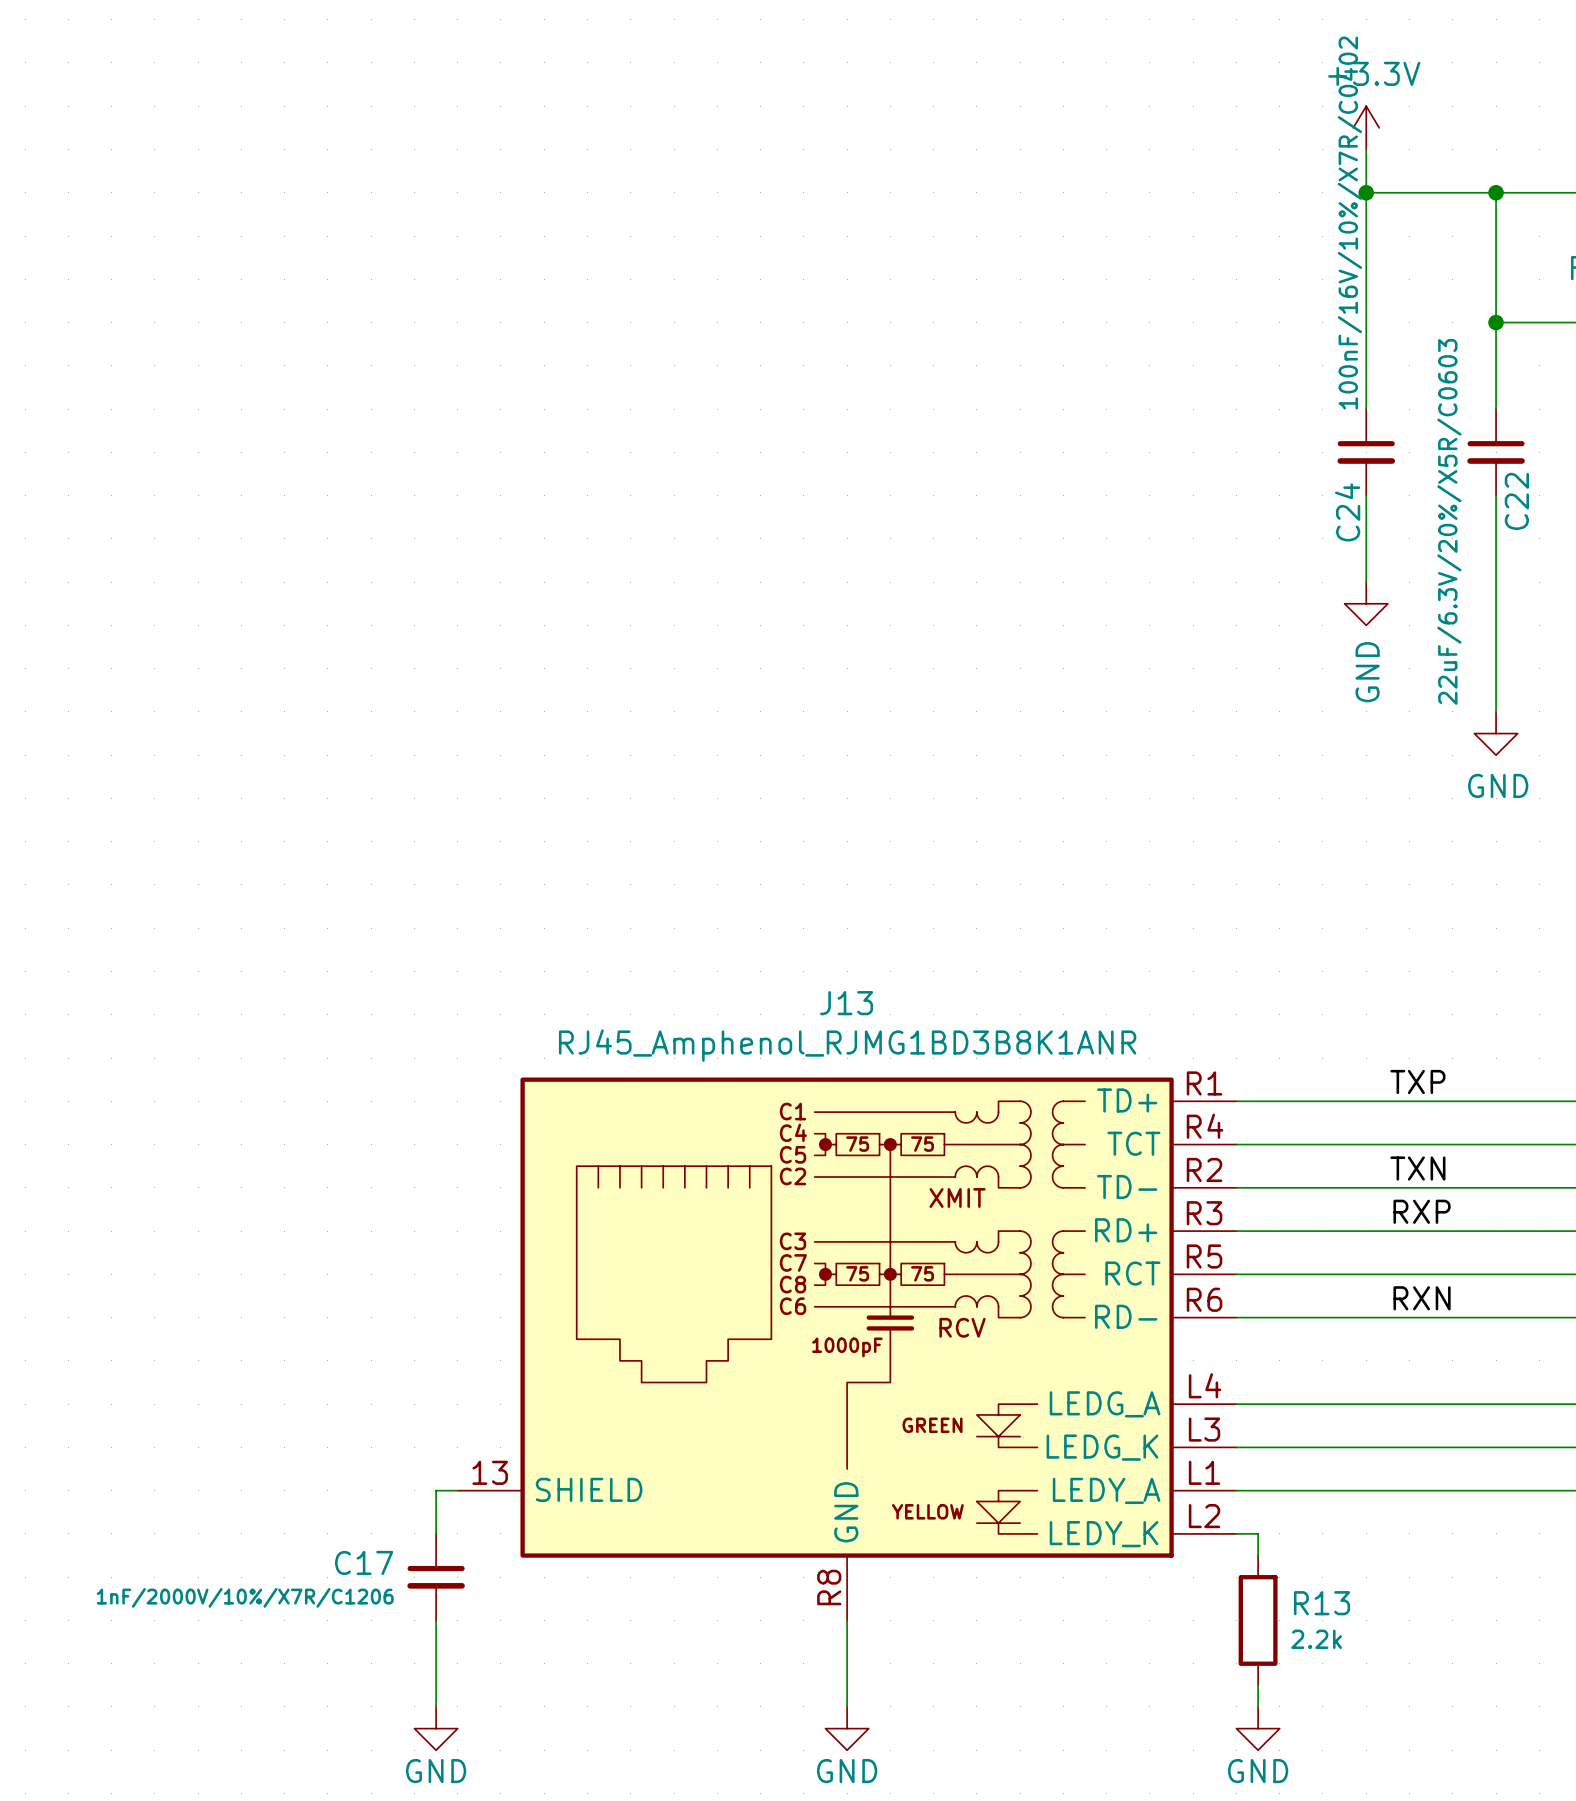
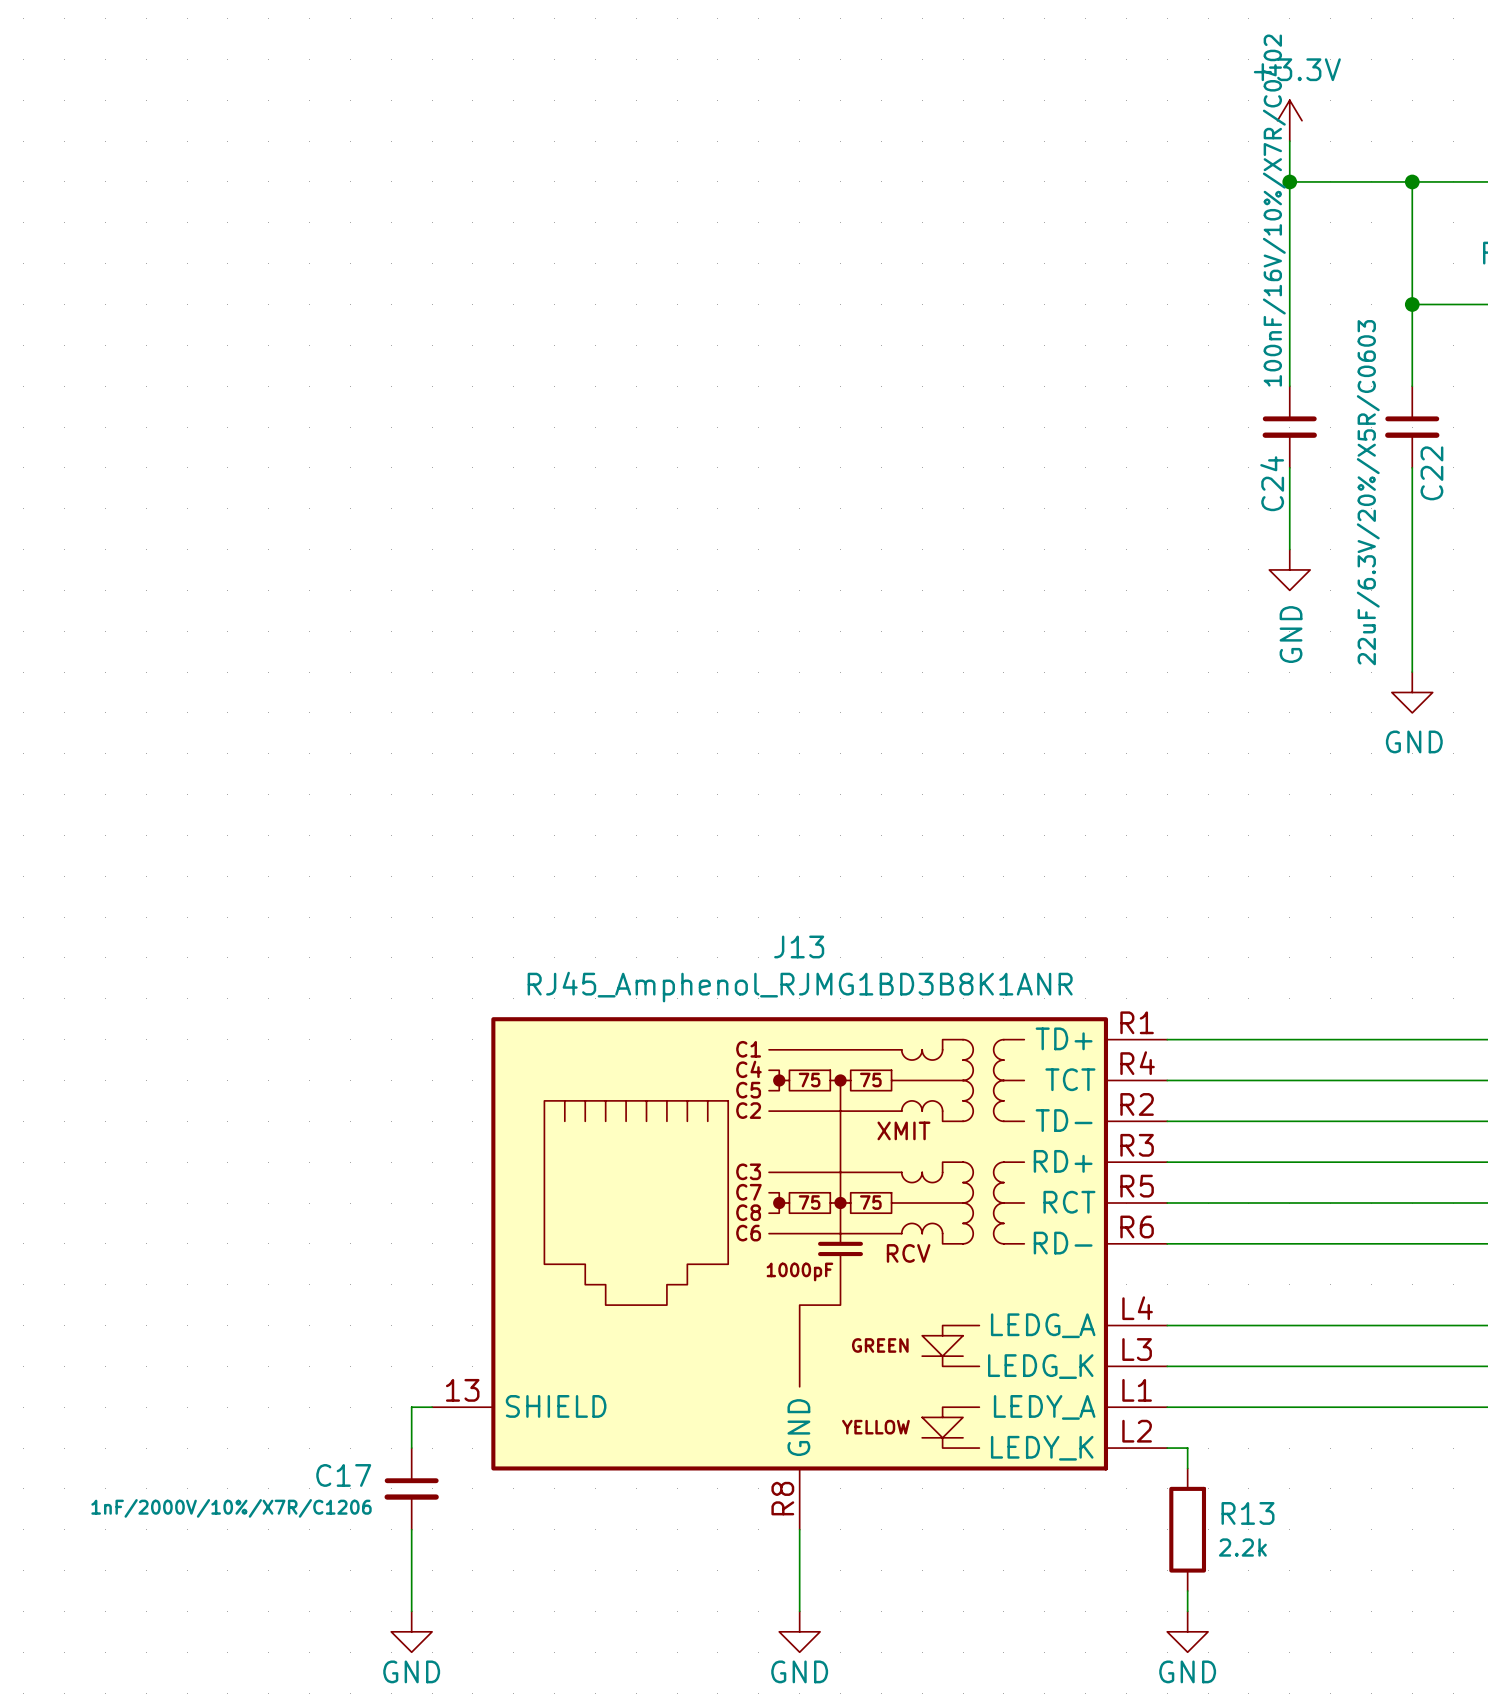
label: TXP (1417, 1081) -> none
label: TXN (1417, 1168) -> none
label: RXP (1422, 1211) -> none
label: RXN (1422, 1298) -> none

